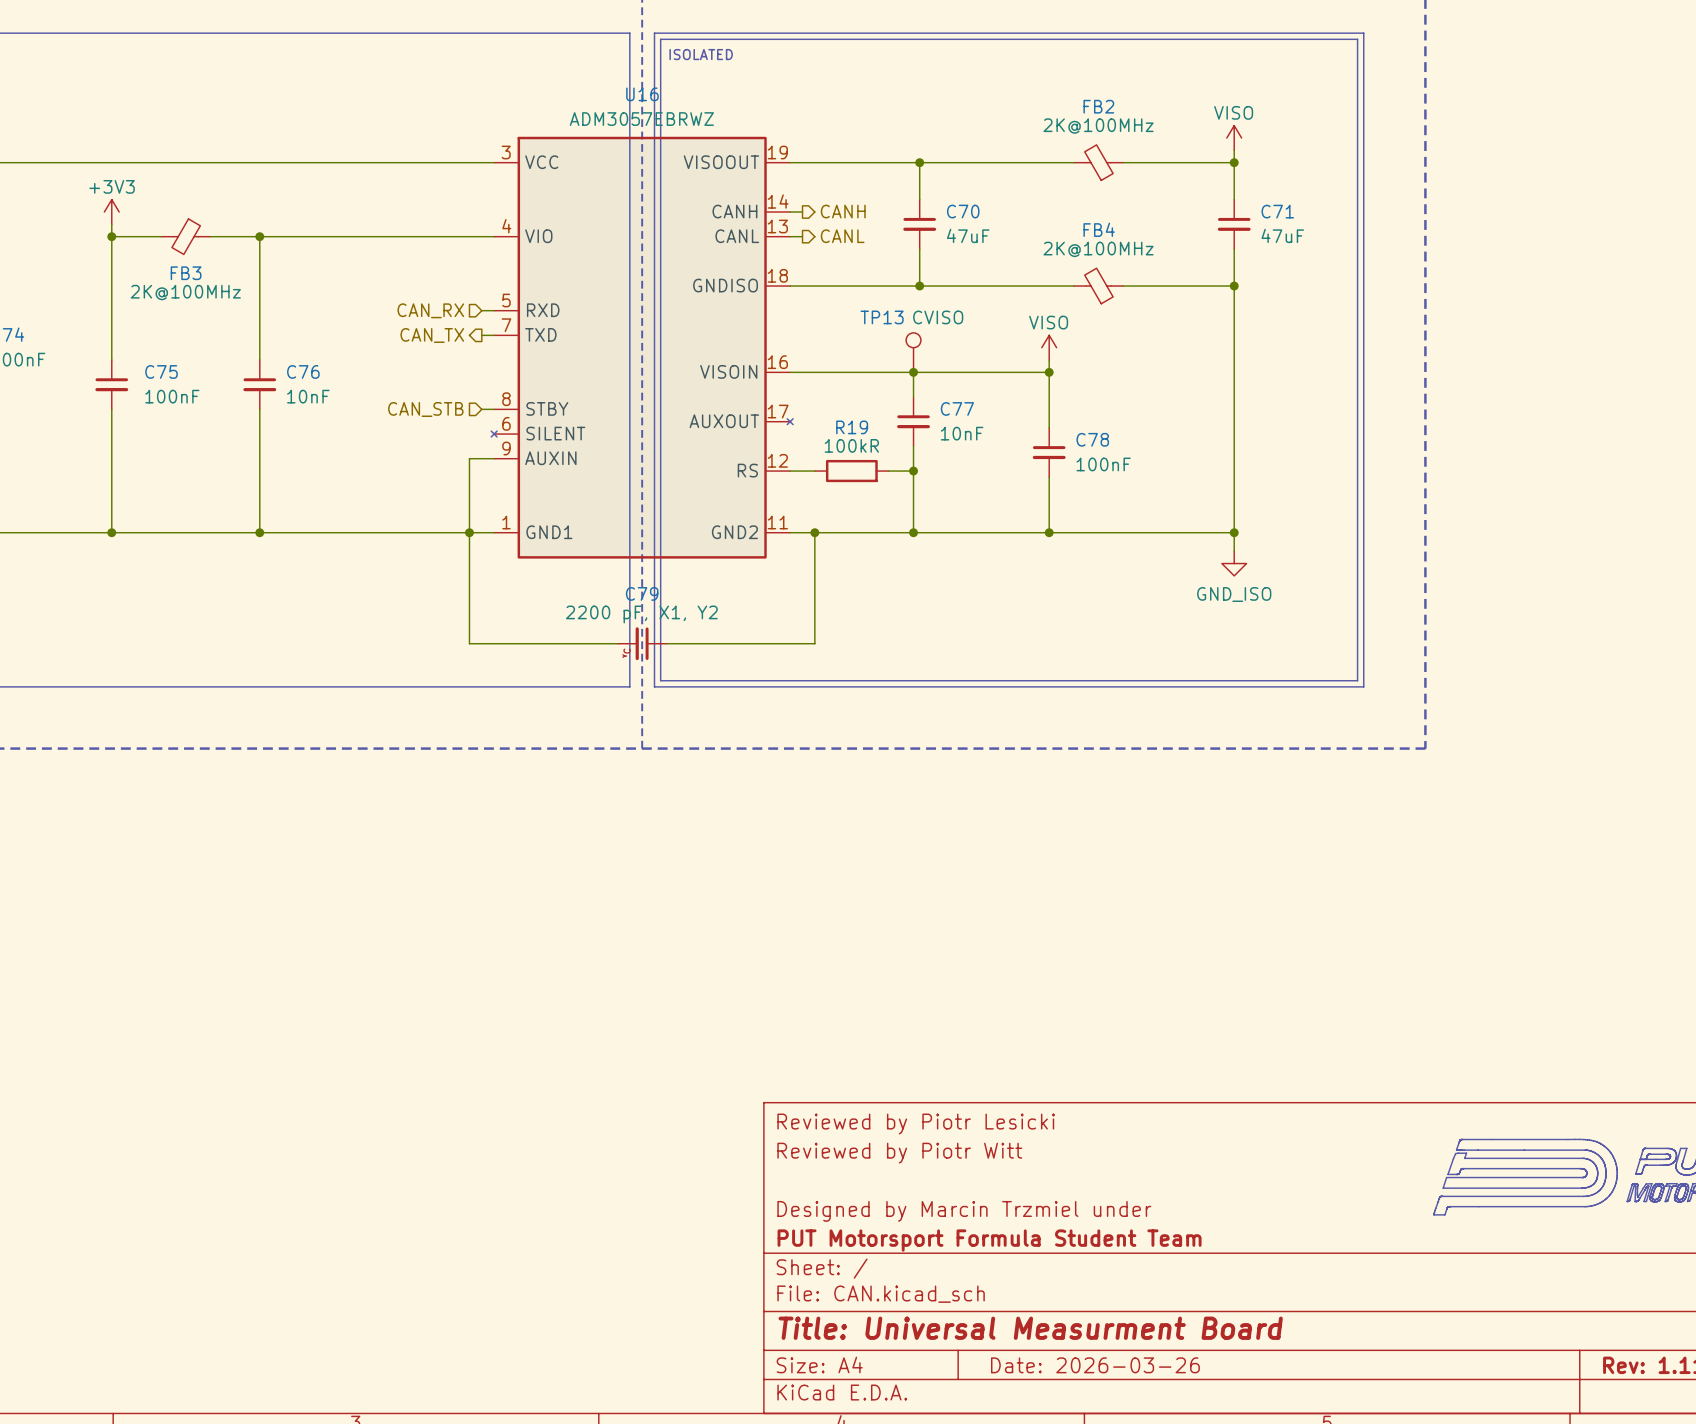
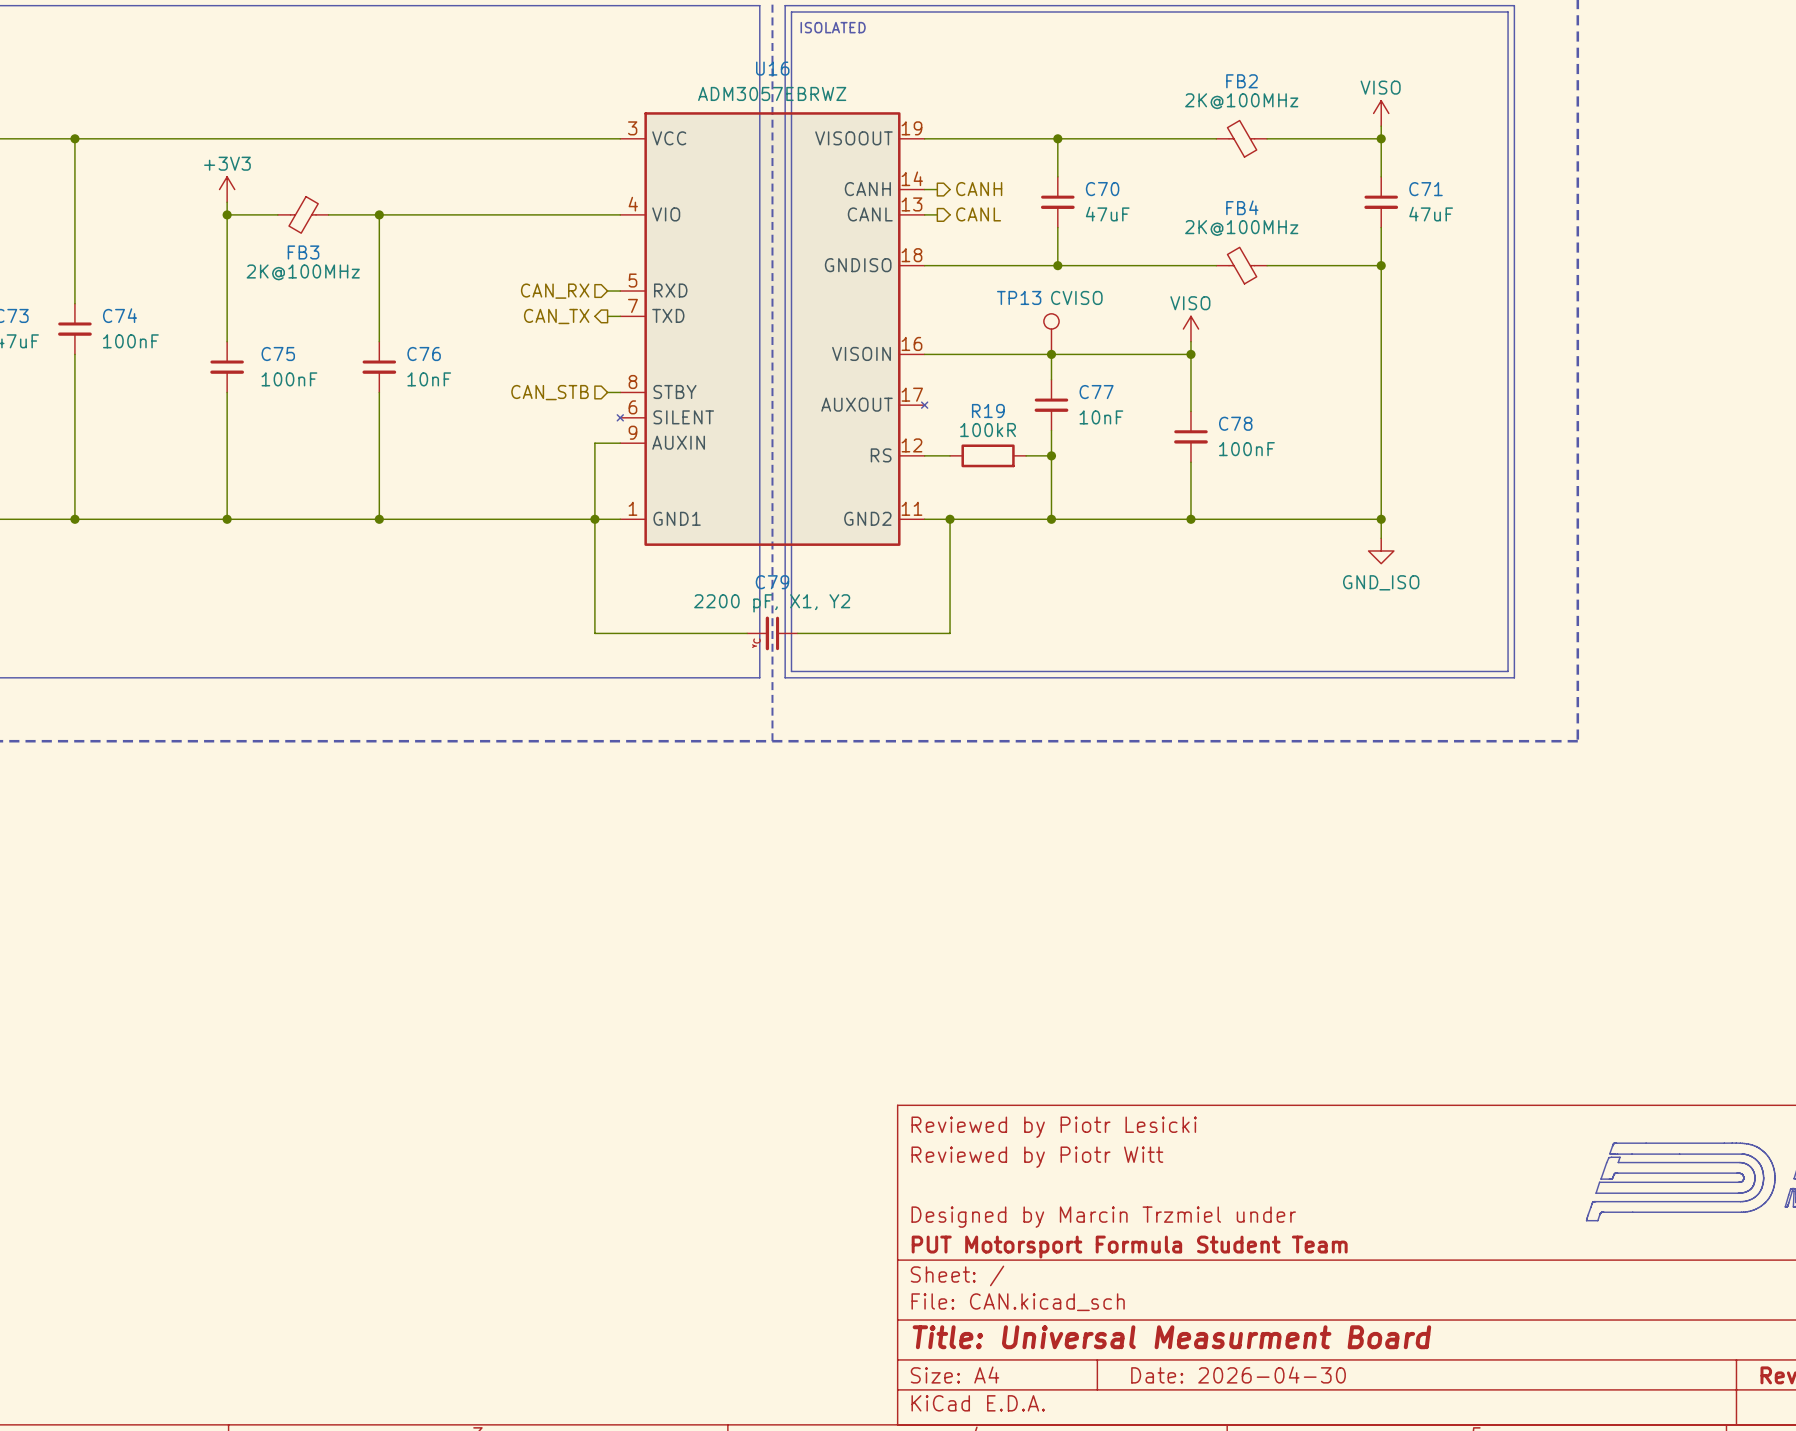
title block: Date: 2026-03-26 (1095, 1365) -> Date: 2026-04-30 (1238, 1375)

